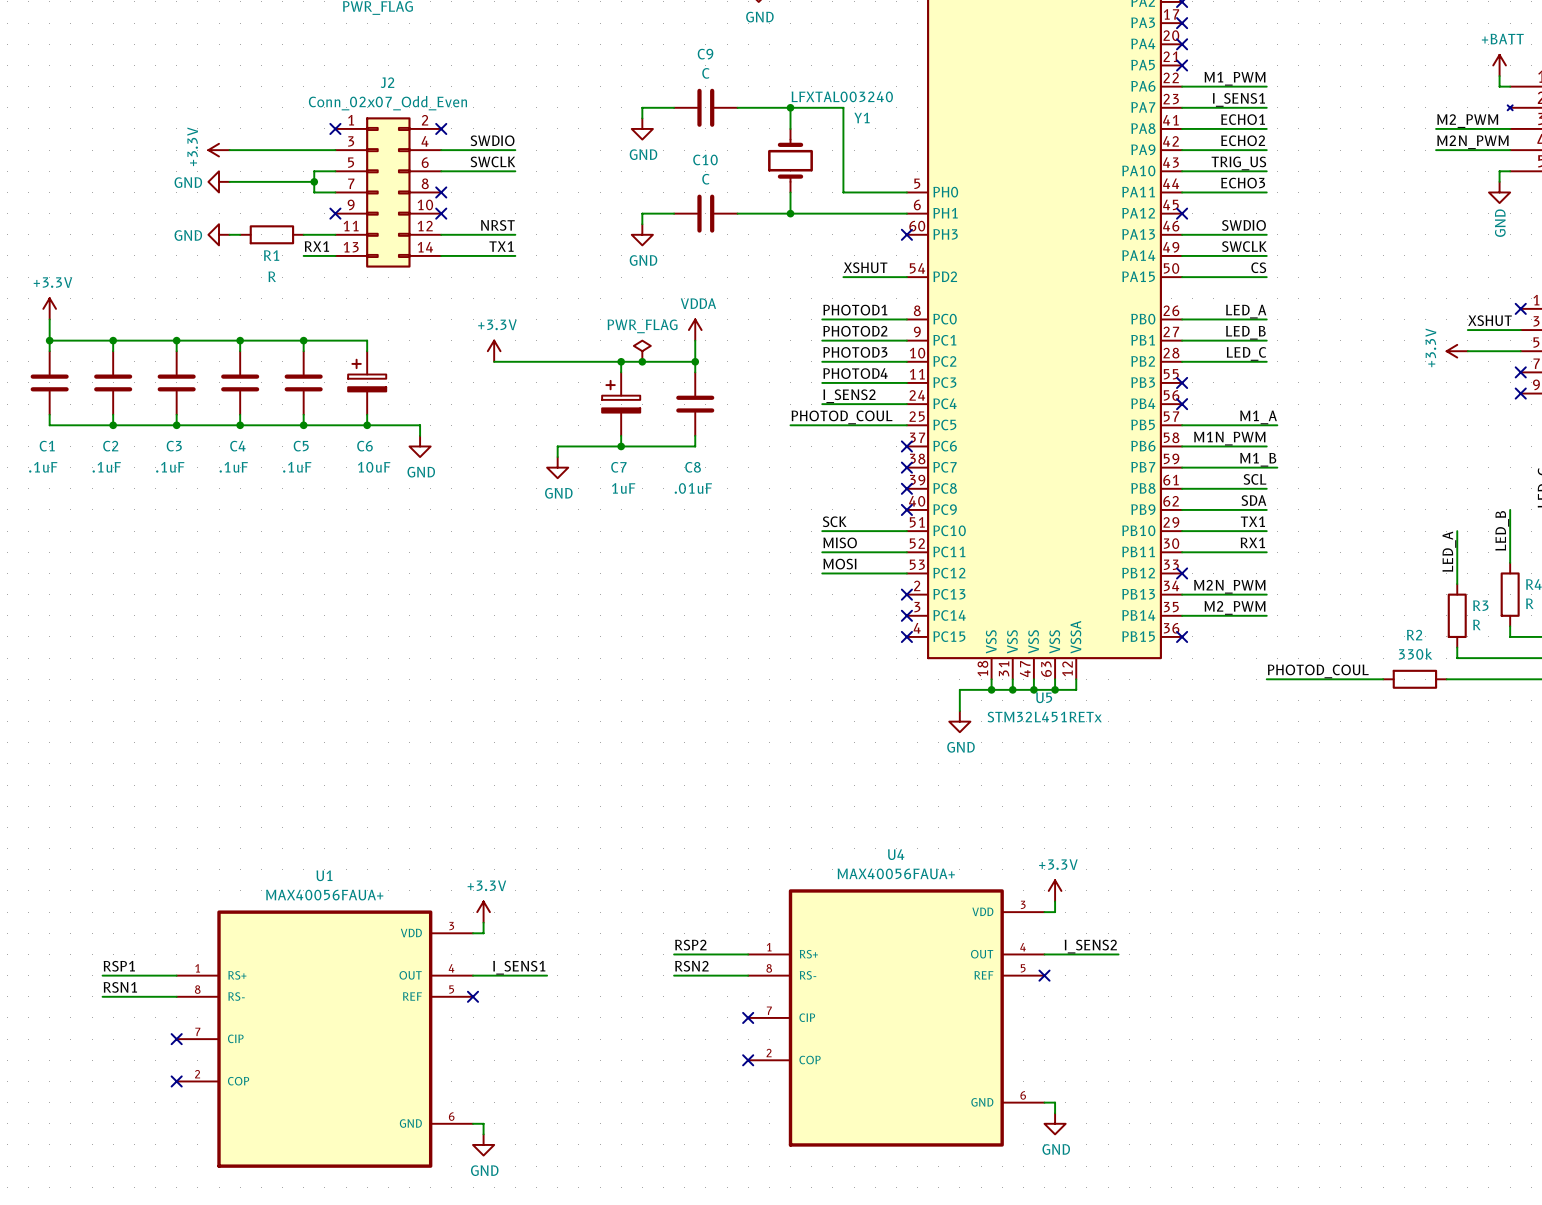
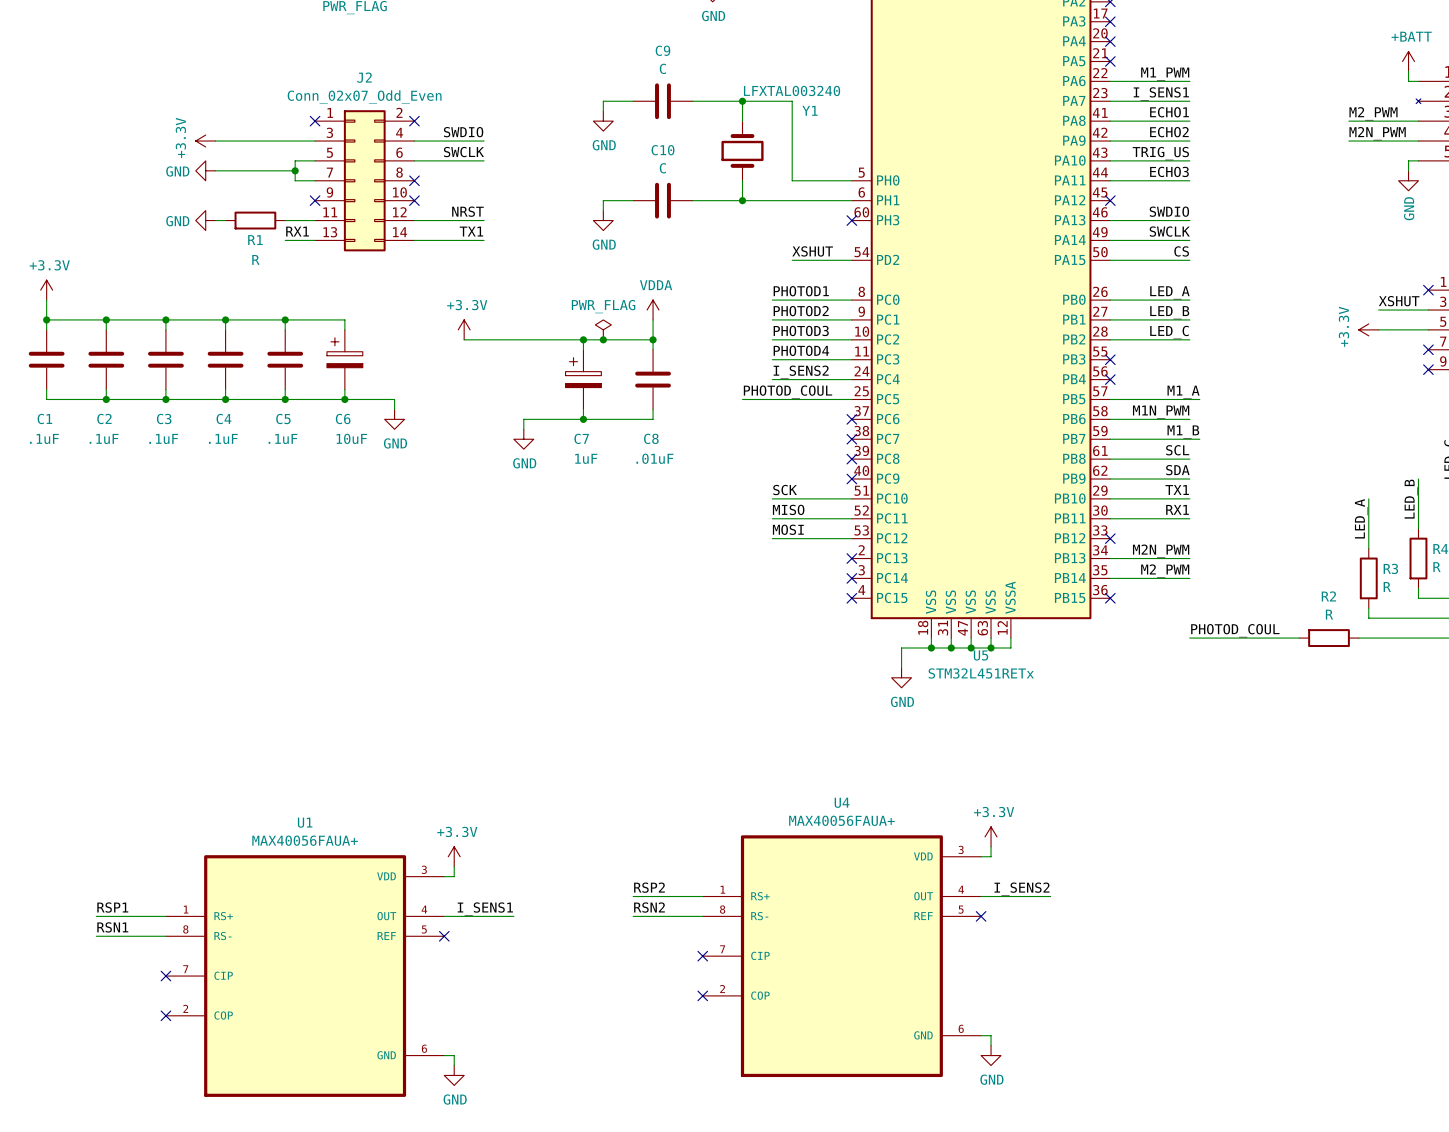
R2 value: 330k (1415, 654) -> R (1329, 614)

